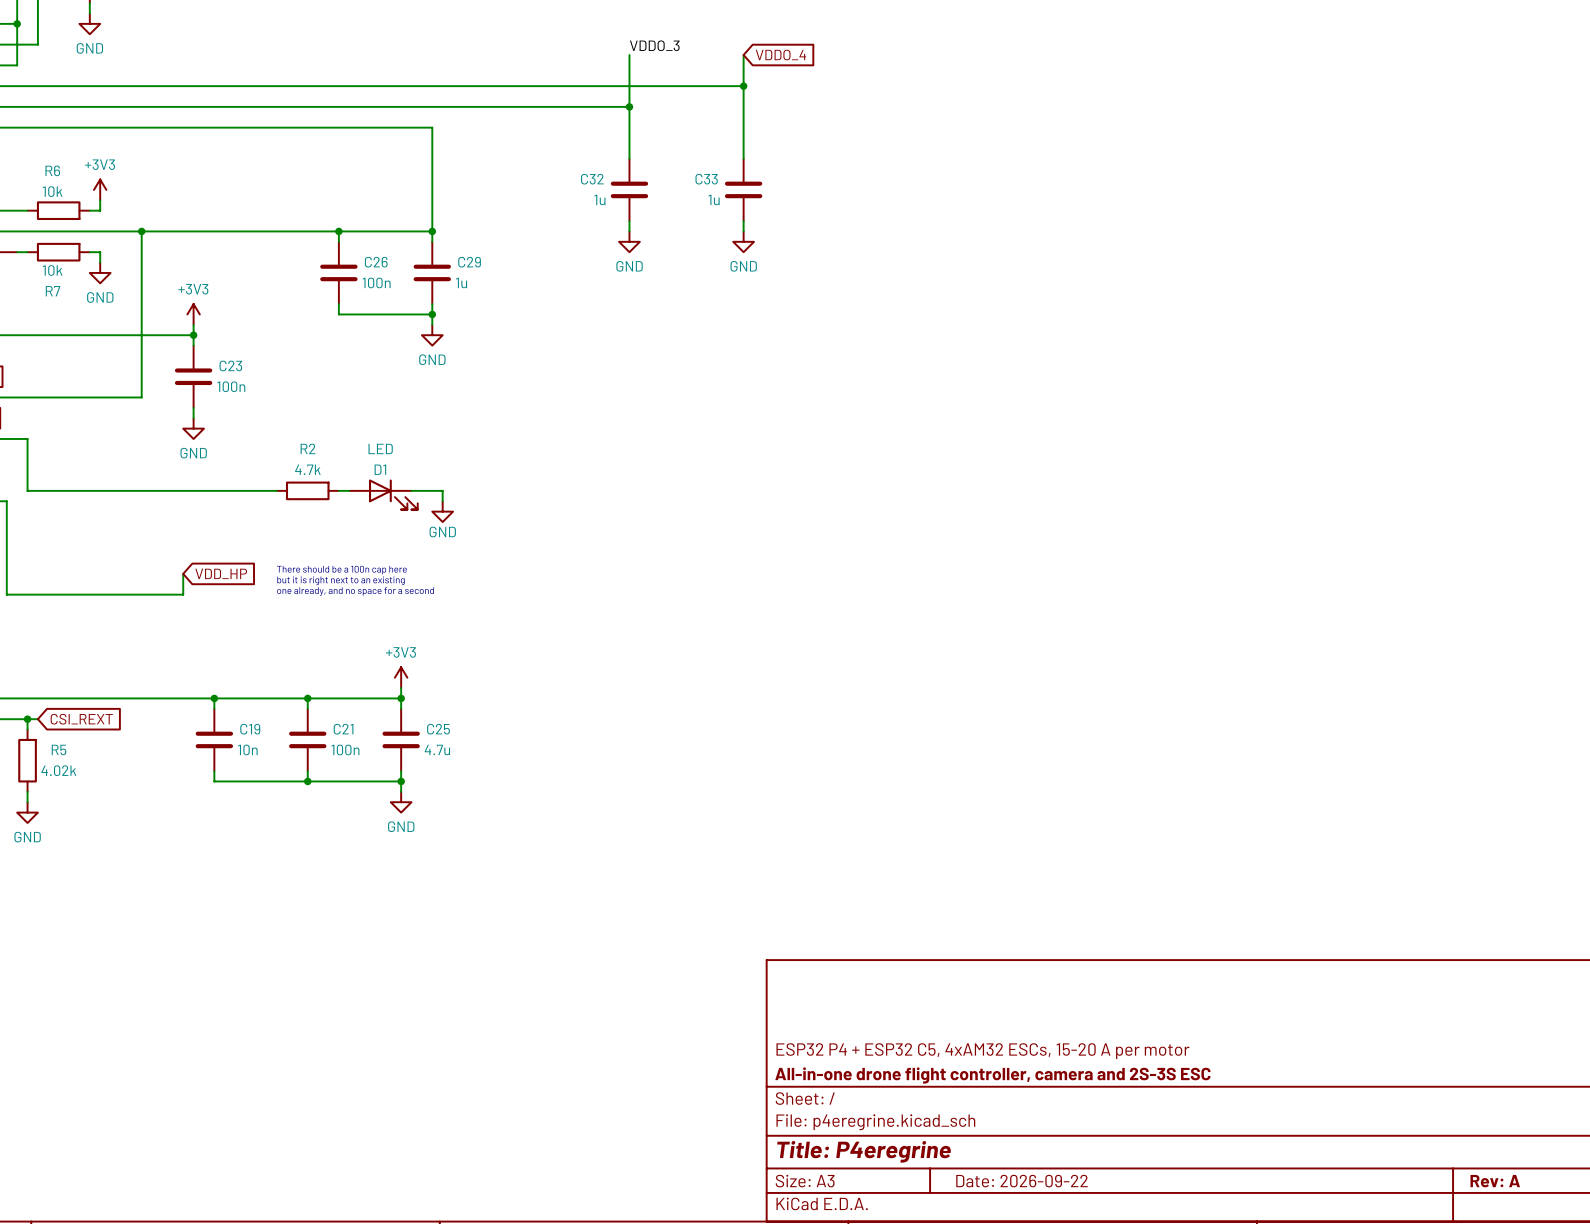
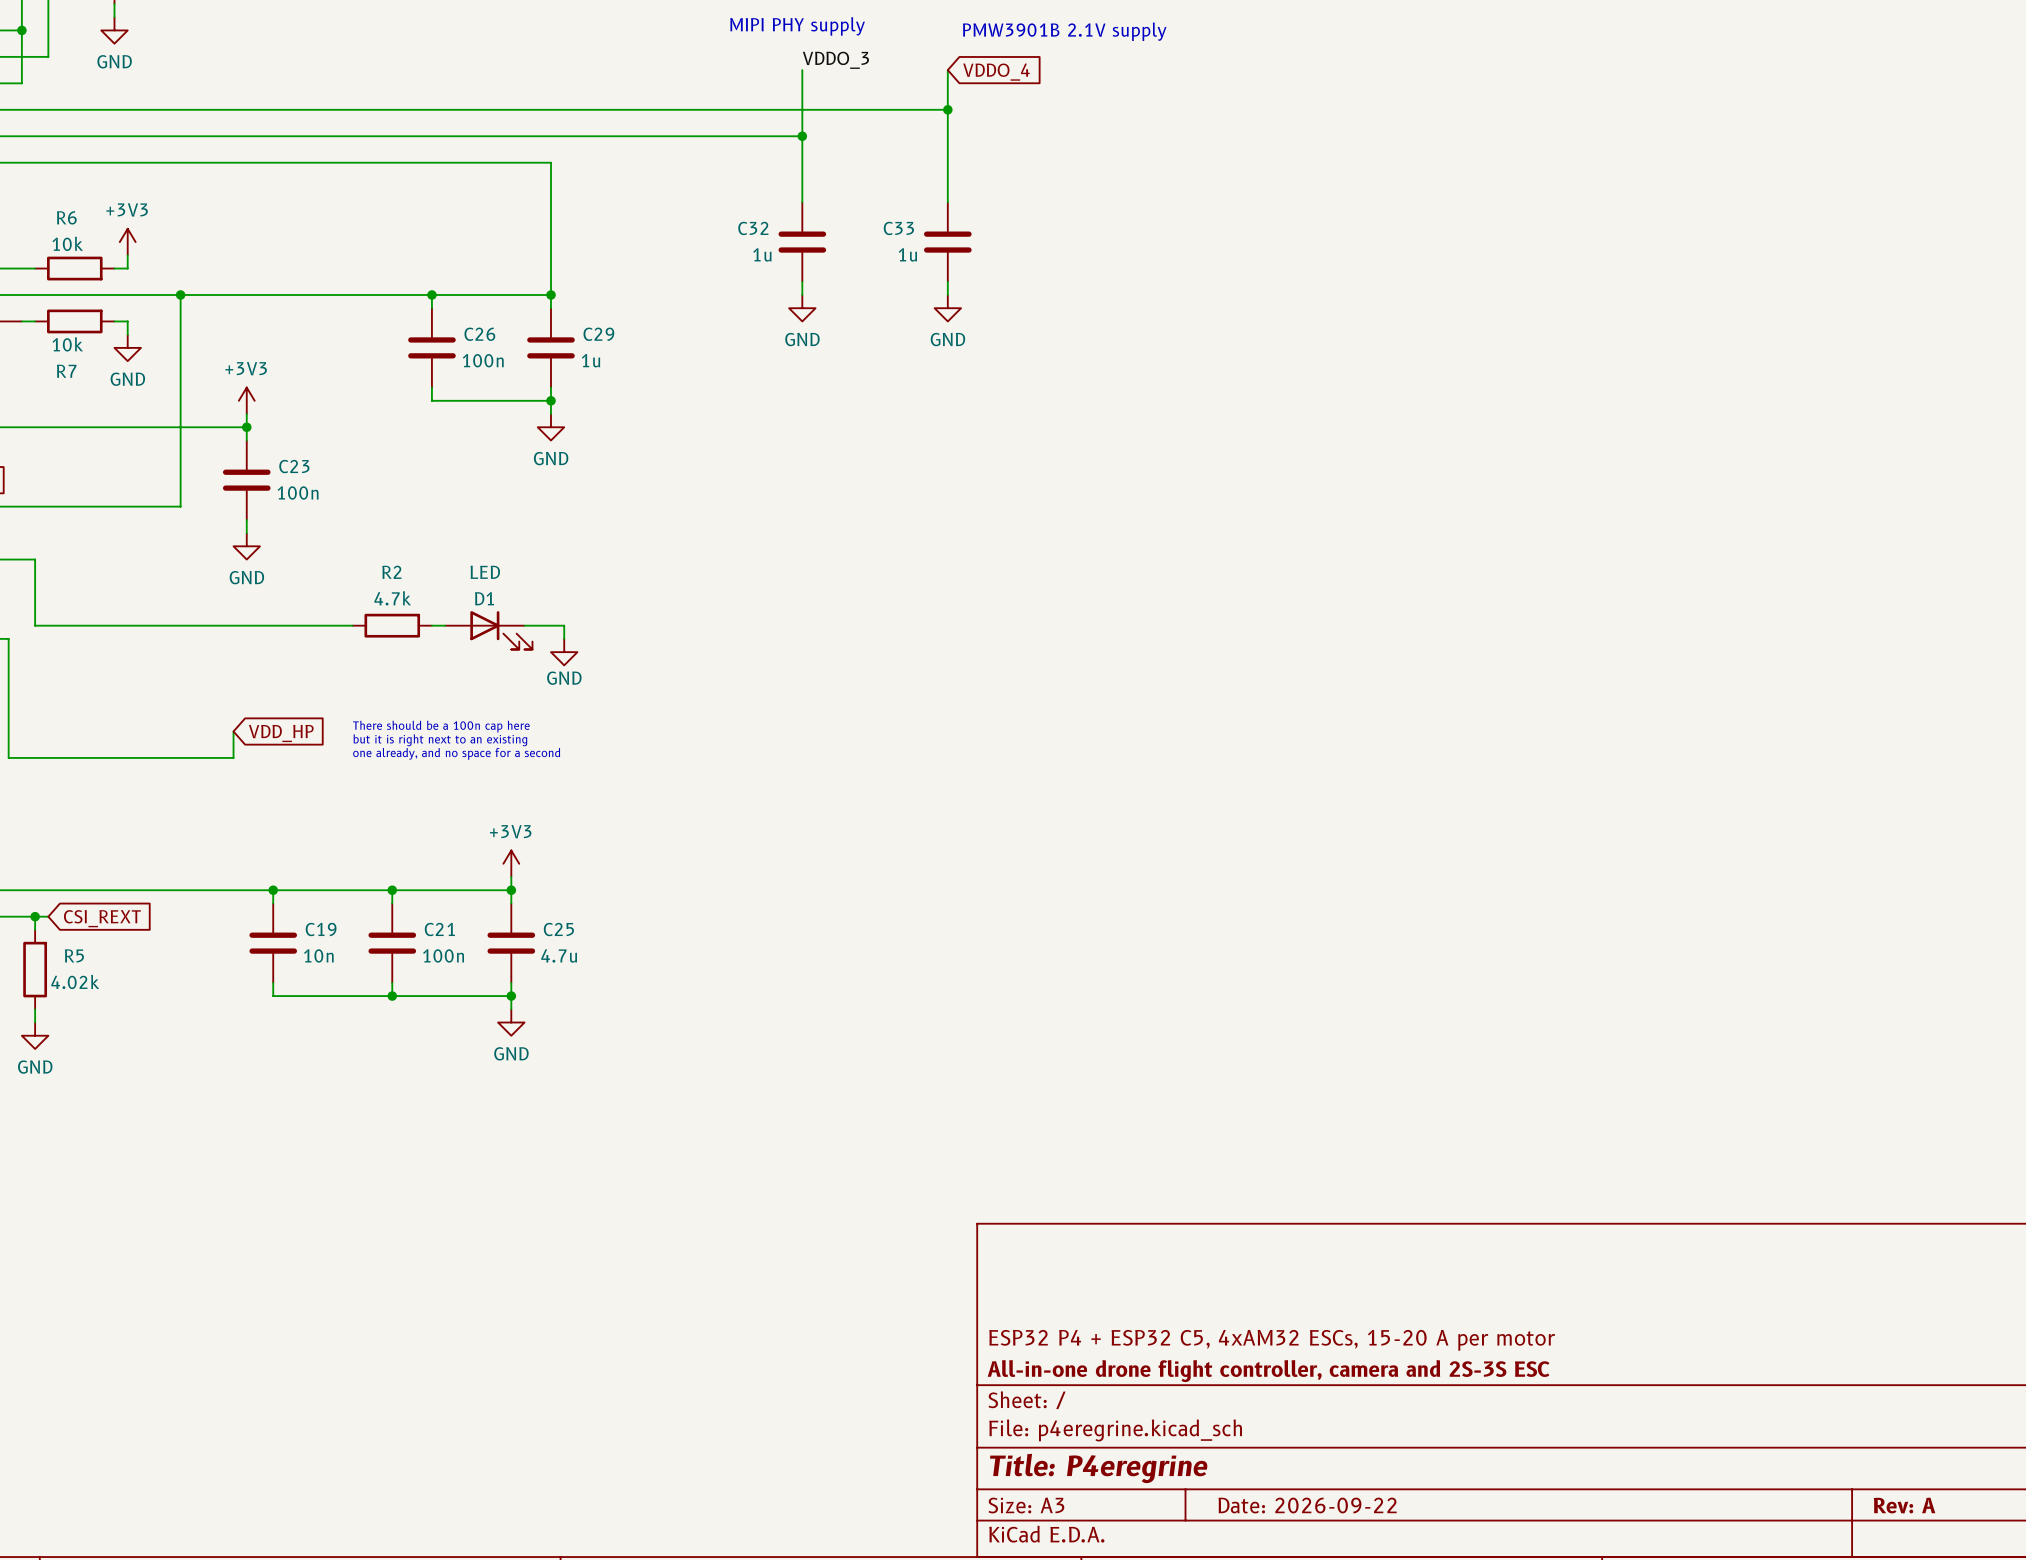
text: none -> MIPI PHY supply (797, 26)
text: none -> PMW3901B 2.1V supply (1064, 31)

